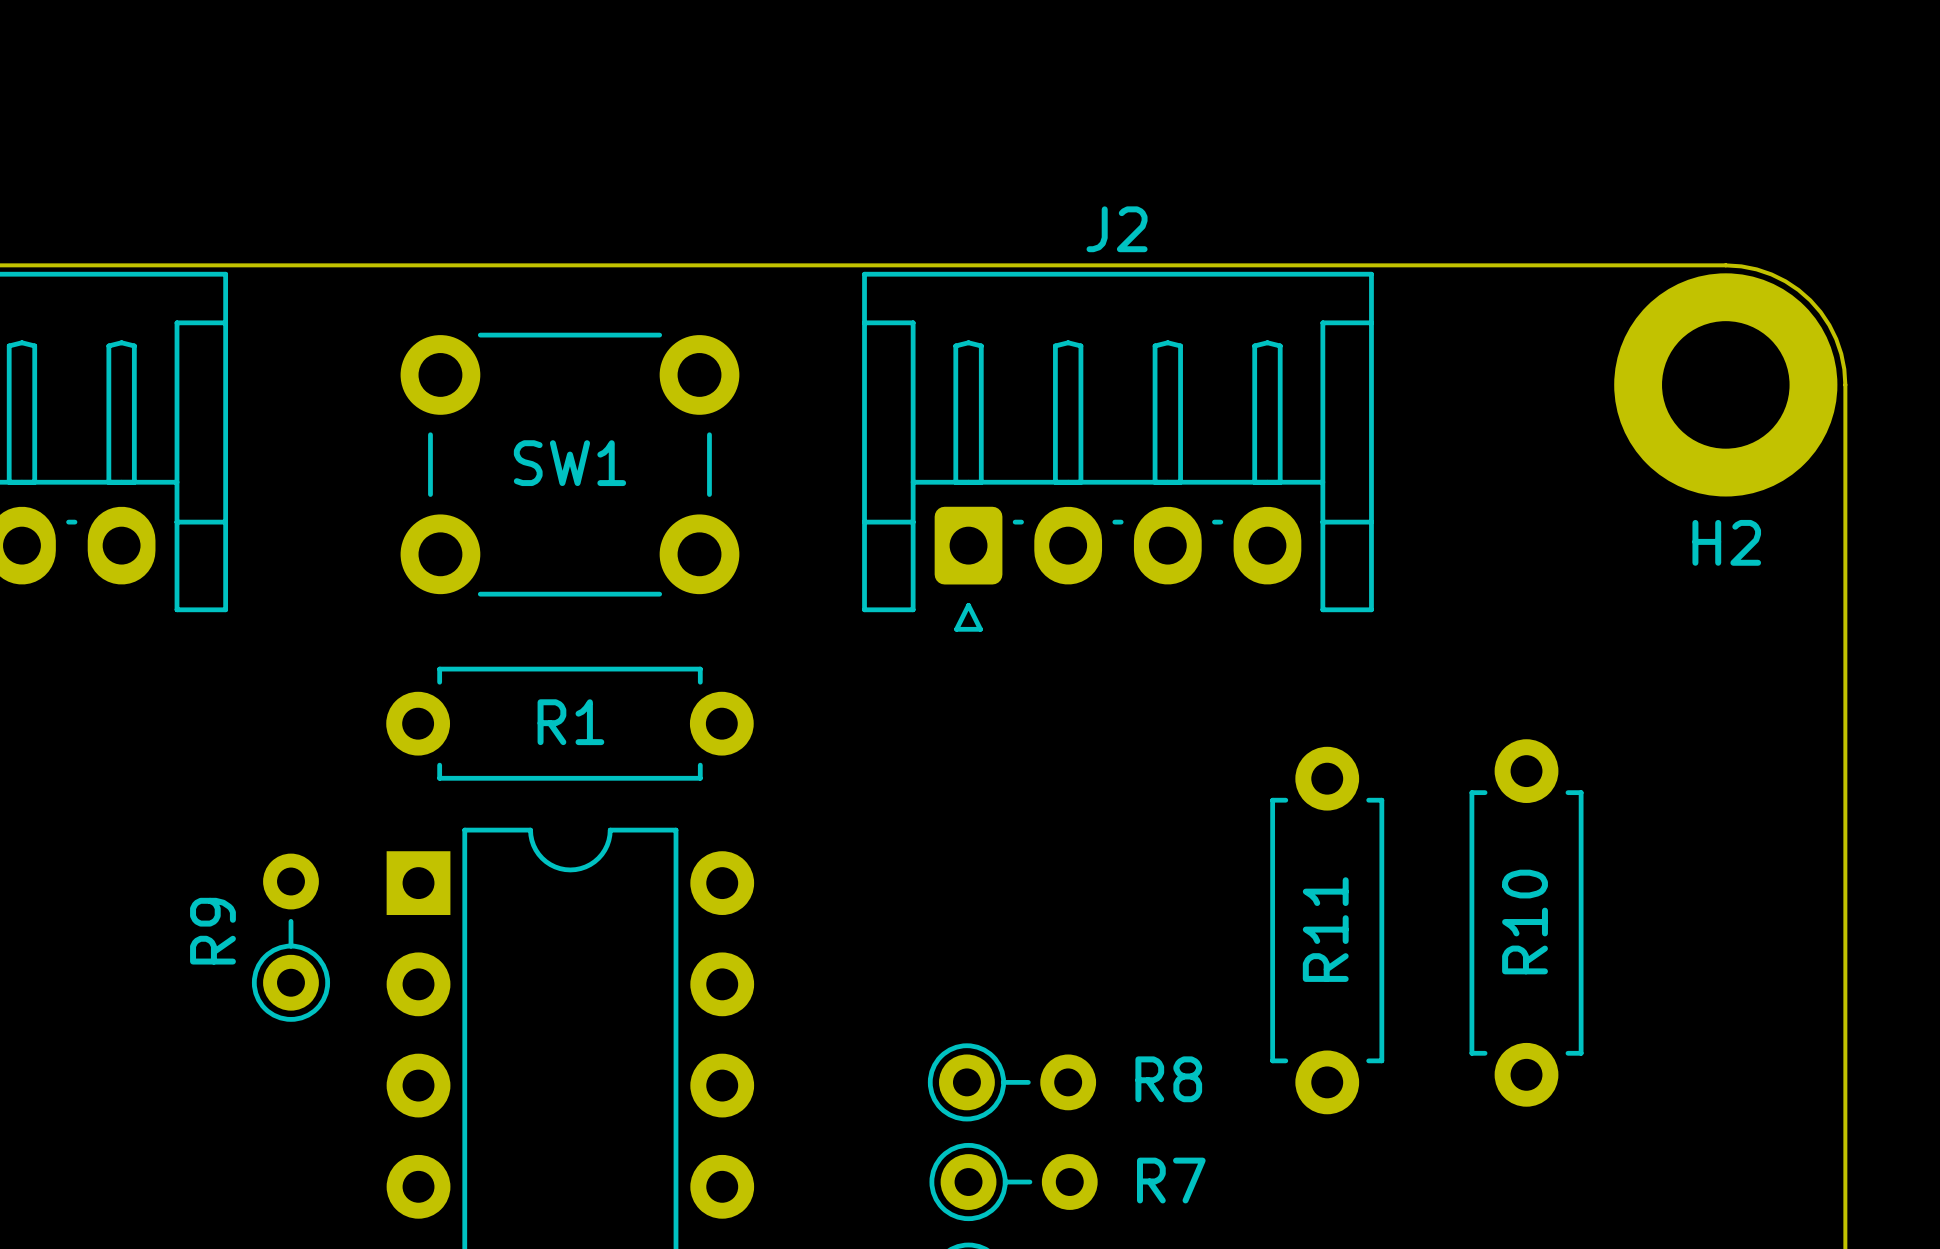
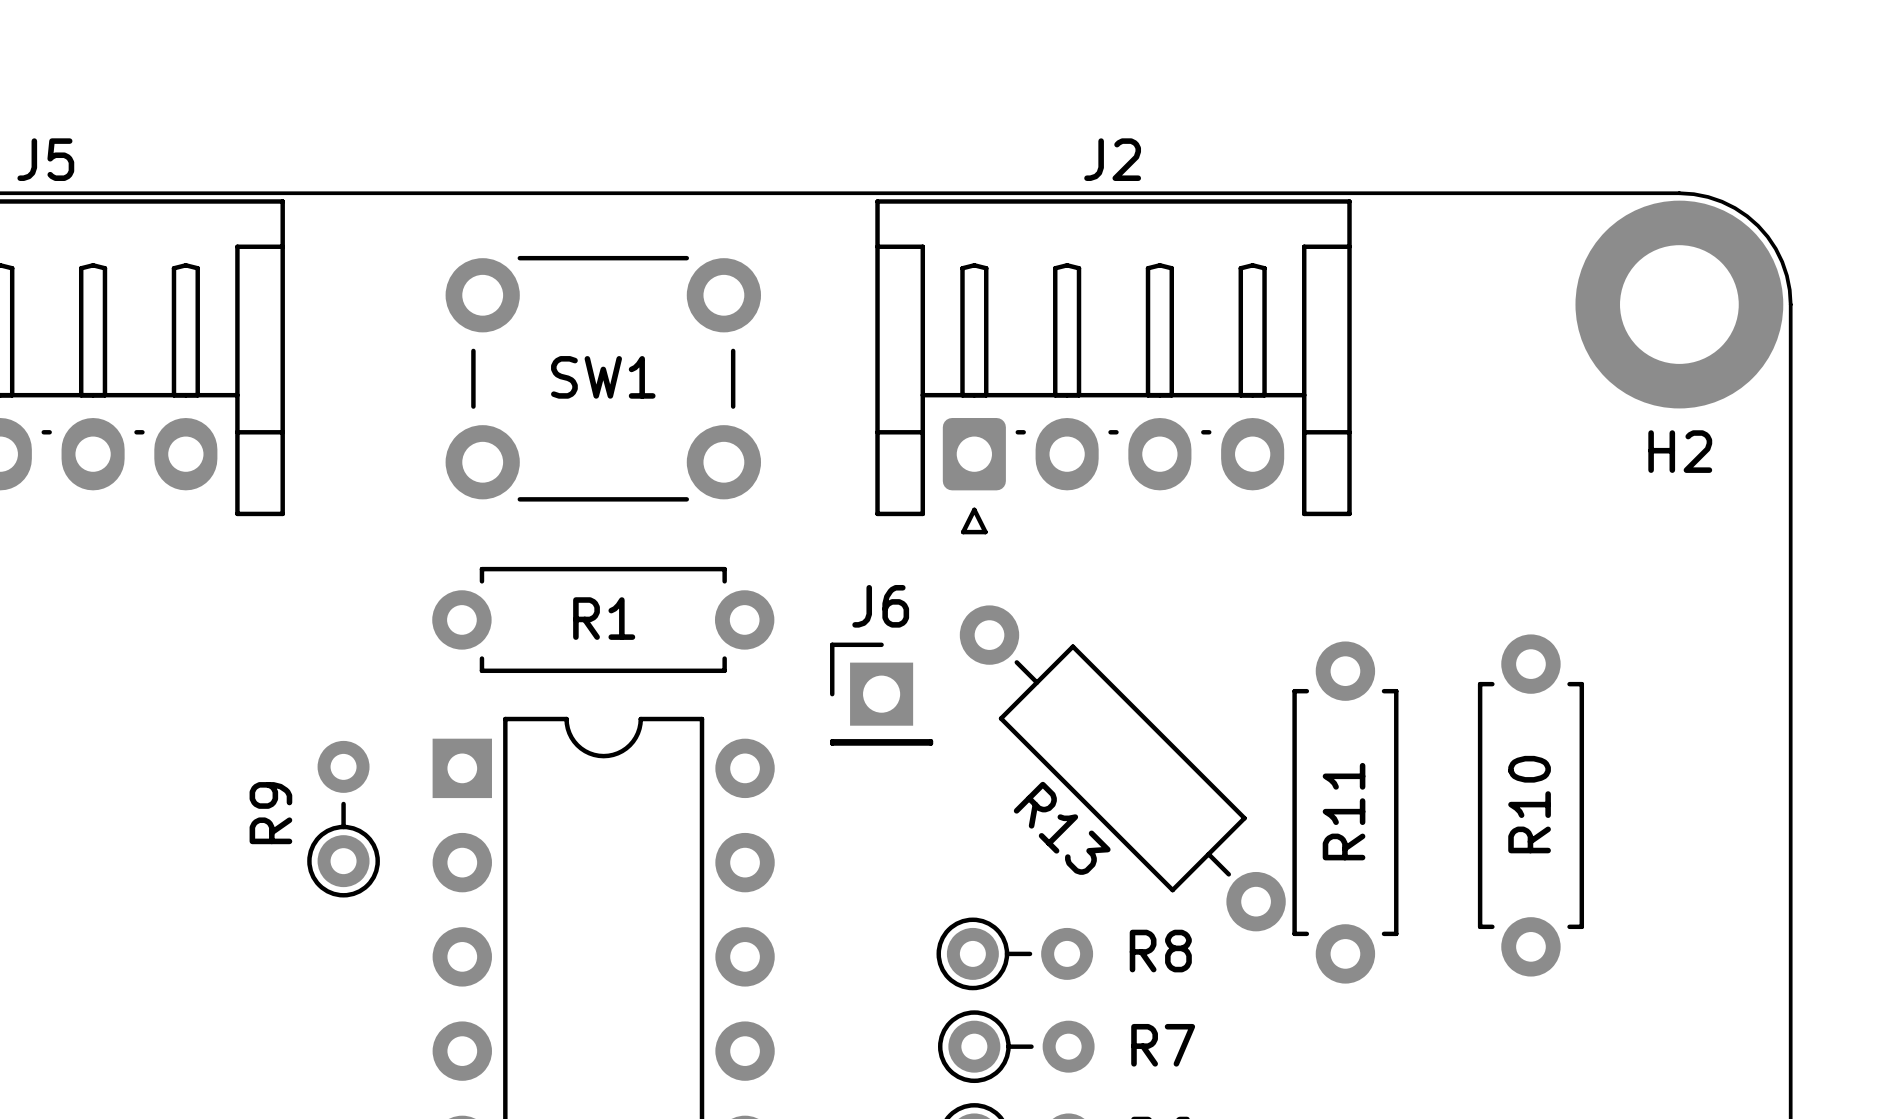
J6: none -> (881, 694)
R13: none -> (1122, 768)
R10 position: (1526, 922) -> (1530, 805)
R11 position: (1327, 930) -> (1345, 812)

